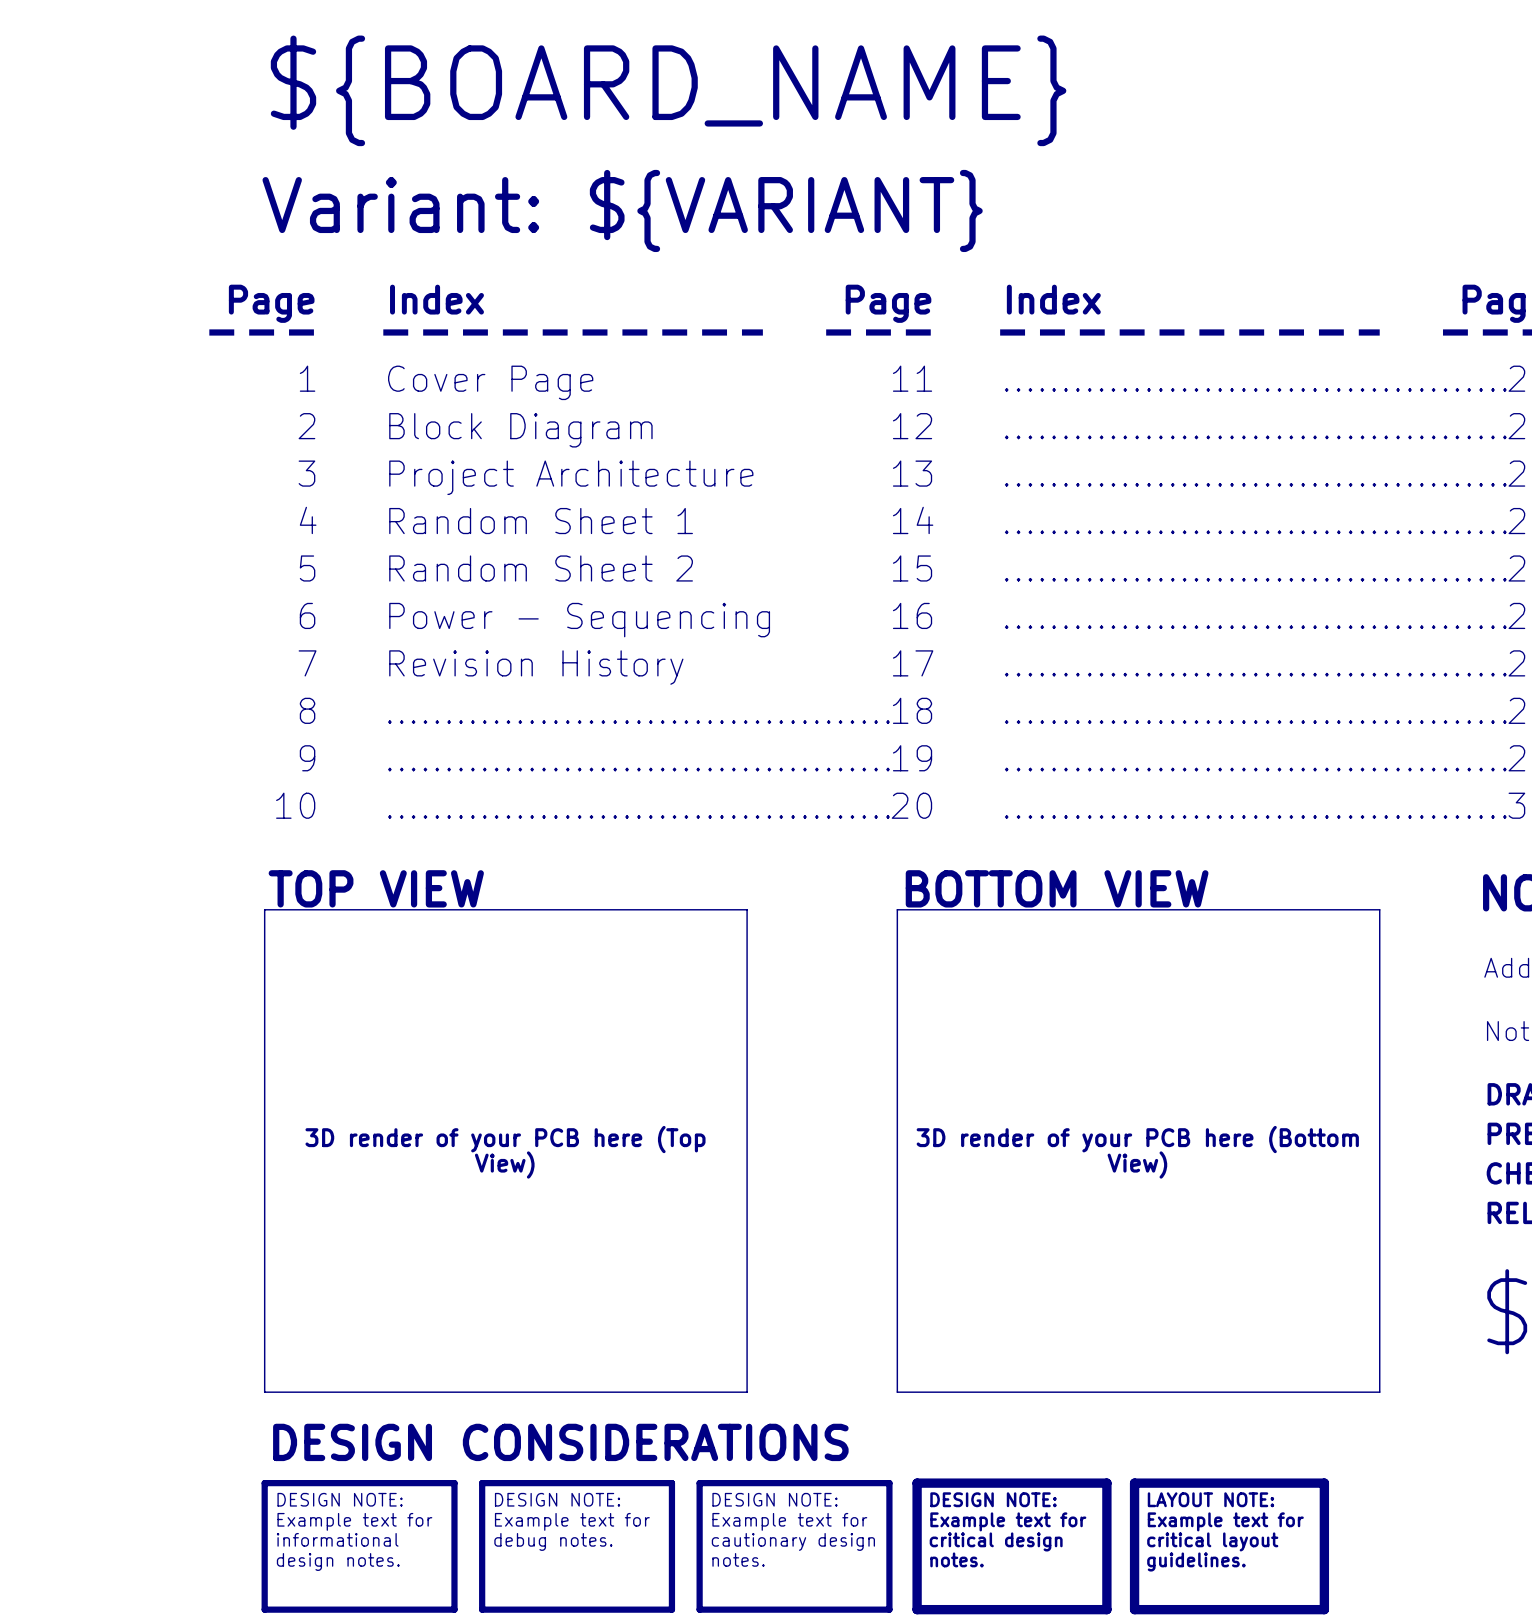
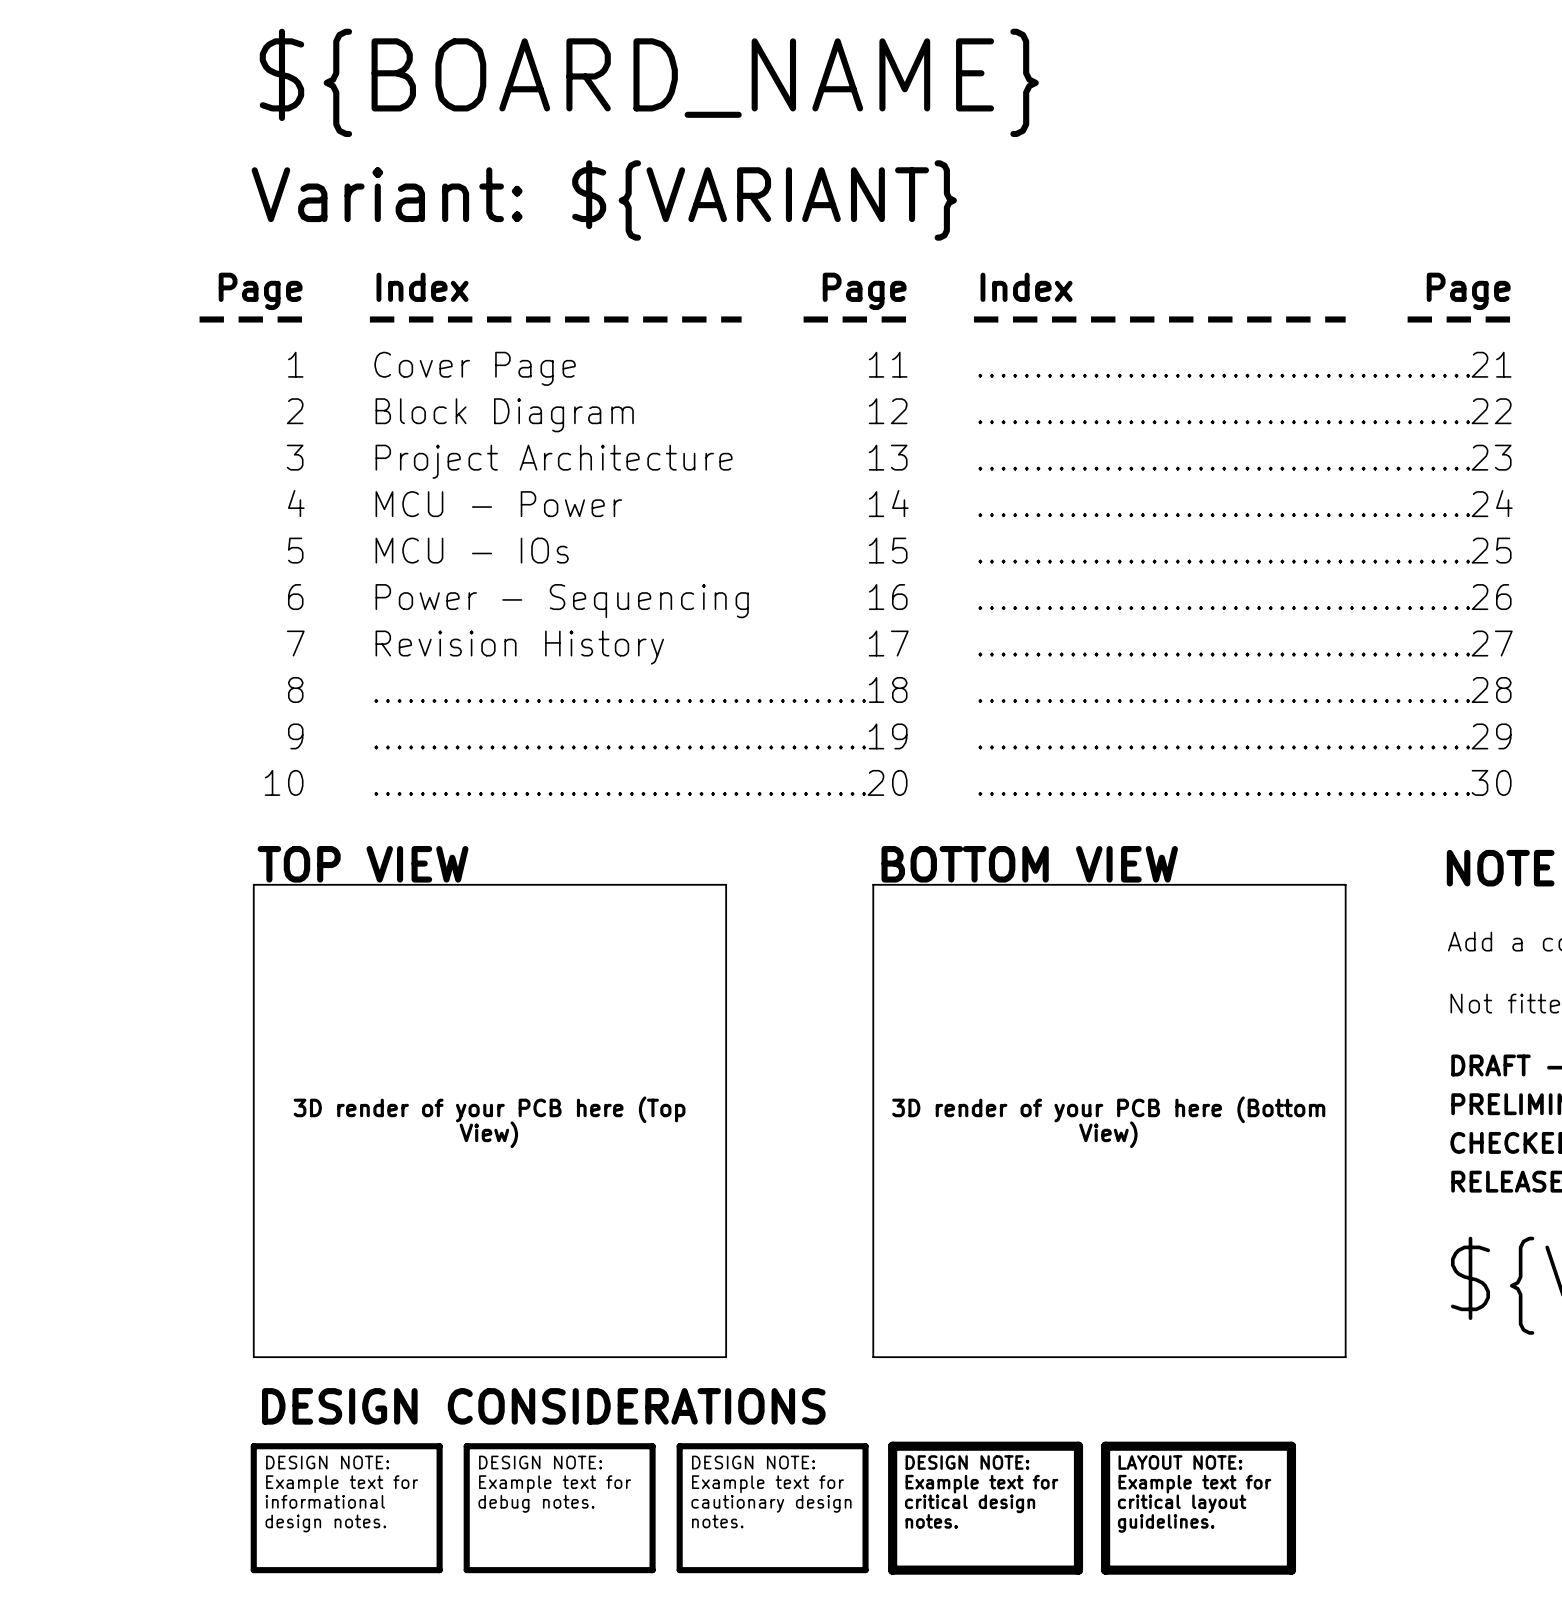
text: Random Sheet 1 (541, 521) -> MCU - Power (498, 504)
text: Random Sheet 2 (541, 568) -> MCU - IOs (472, 550)

